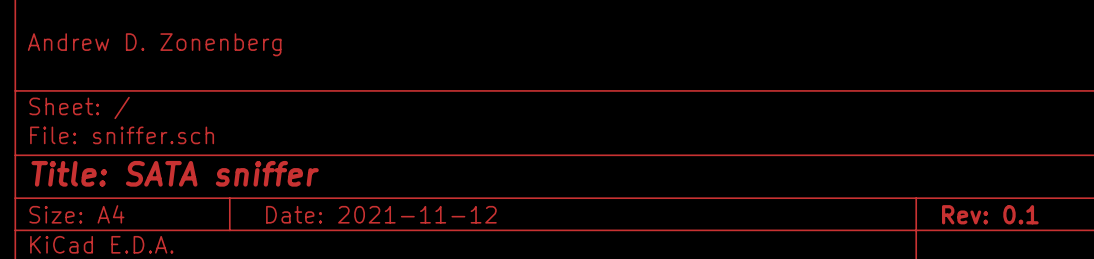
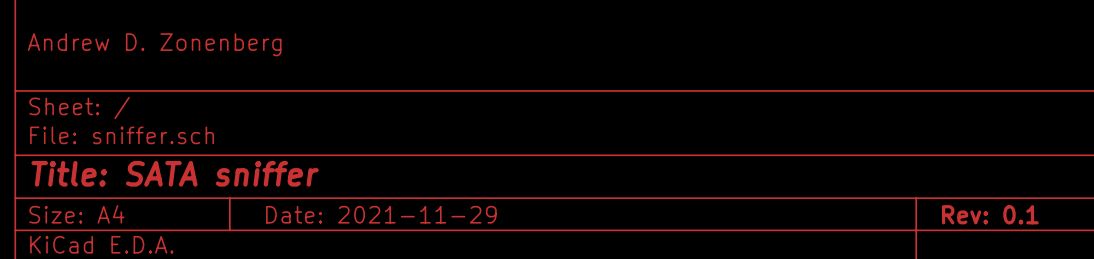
title block: Date: 2021-11-12 (381, 214) -> Date: 2021-11-29 (381, 214)

